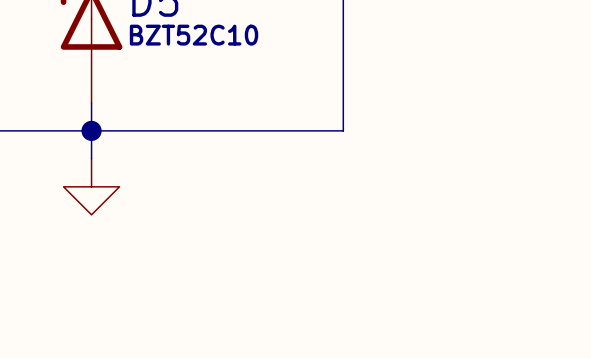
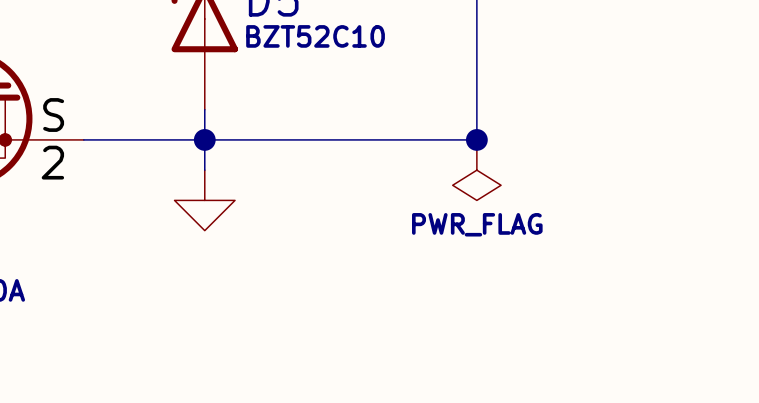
junction: none -> (476, 139)
power symbol: none -> PWR_FLAG (476, 170)

